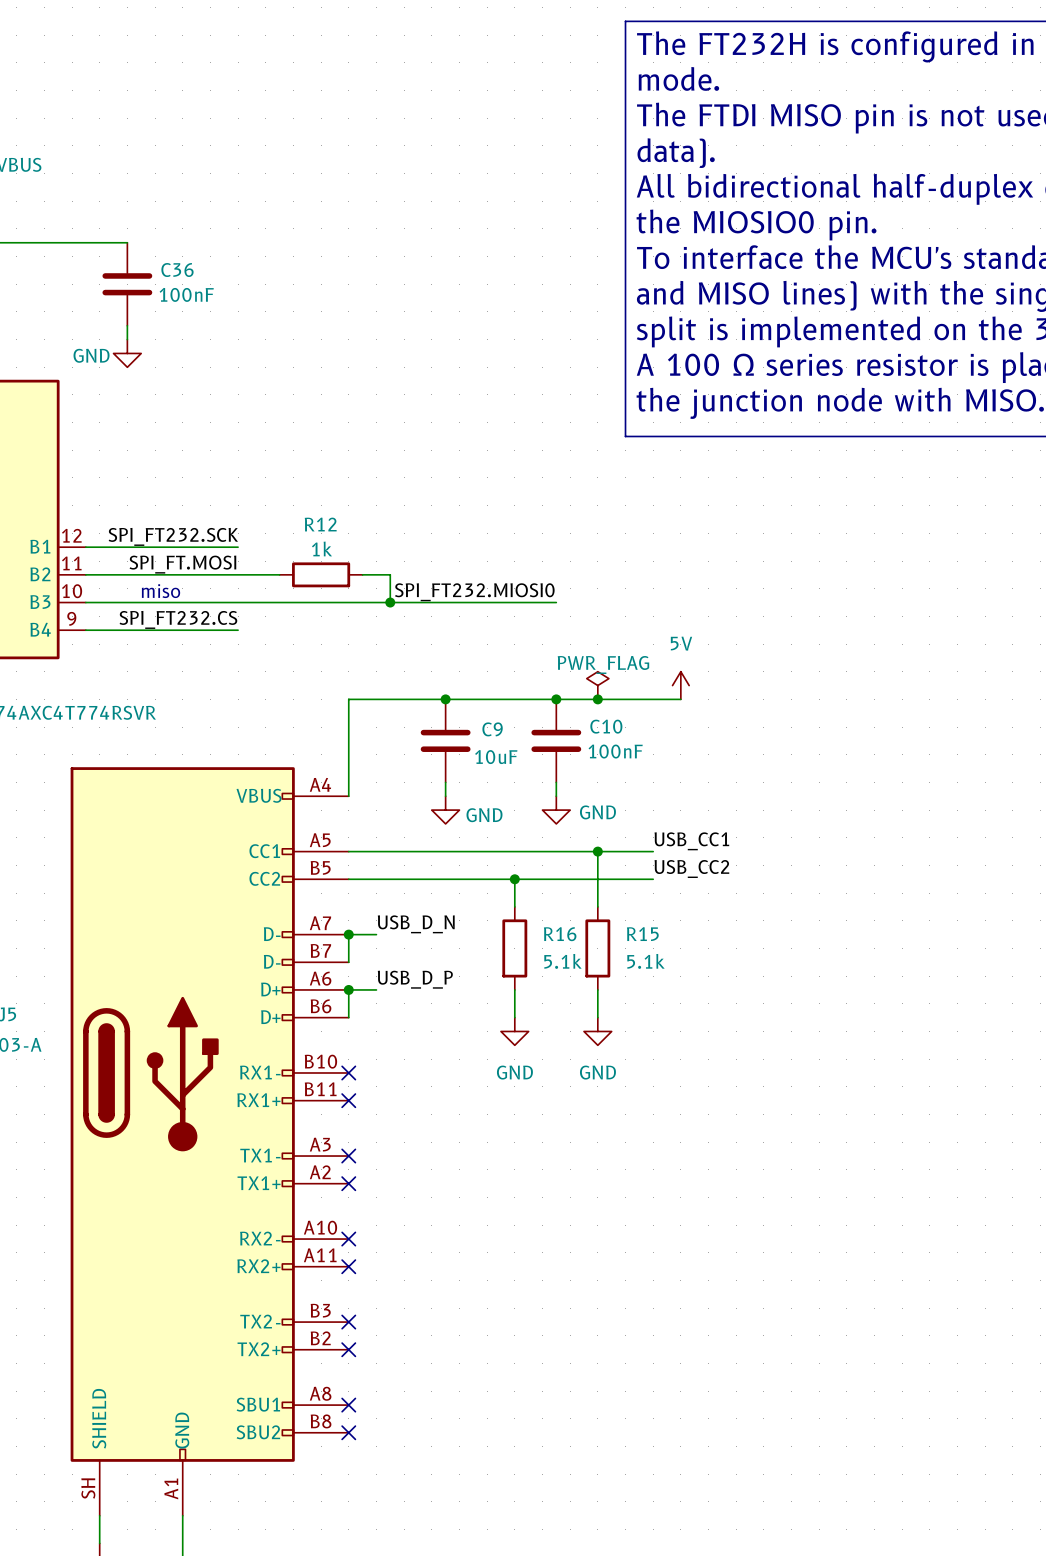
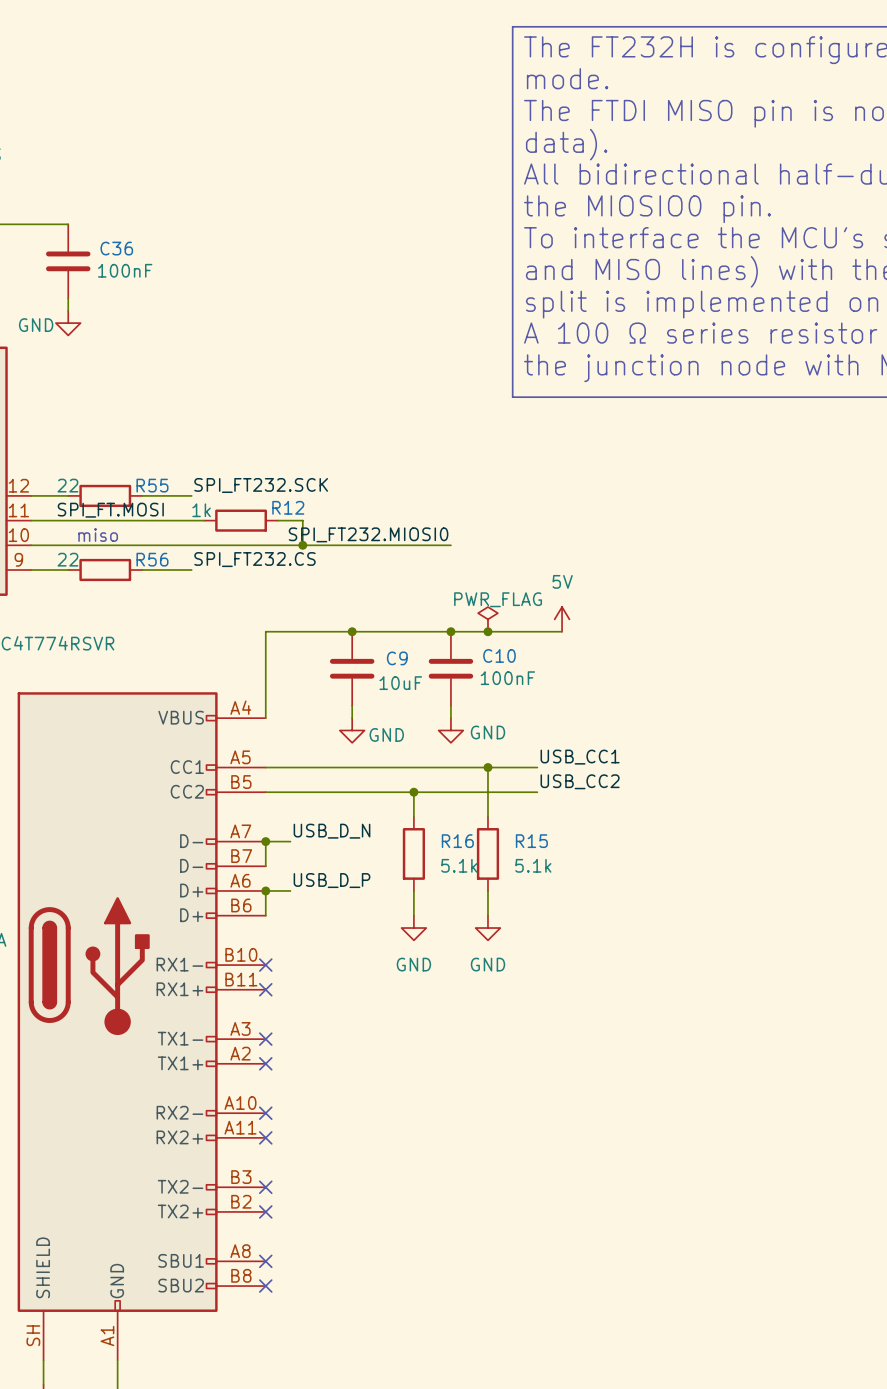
R12 name position: R12 (320, 524) -> R12 (288, 507)
label position: SPI_FT232.SCK (173, 536) -> SPI_FT232.SCK (261, 485)
wire: (127, 547) (210, 547) -> none
R55: none -> 22 (105, 495)
wire: none -> (167, 495) (191, 495)
R12 value position: 1k (321, 548) -> 1k (201, 510)
label position: SPI_FT232.CS (178, 619) -> SPI_FT232.CS (254, 559)
wire: (127, 630) (210, 630) -> none
R56: none -> 22 (105, 570)
wire: none -> (167, 570) (191, 570)

